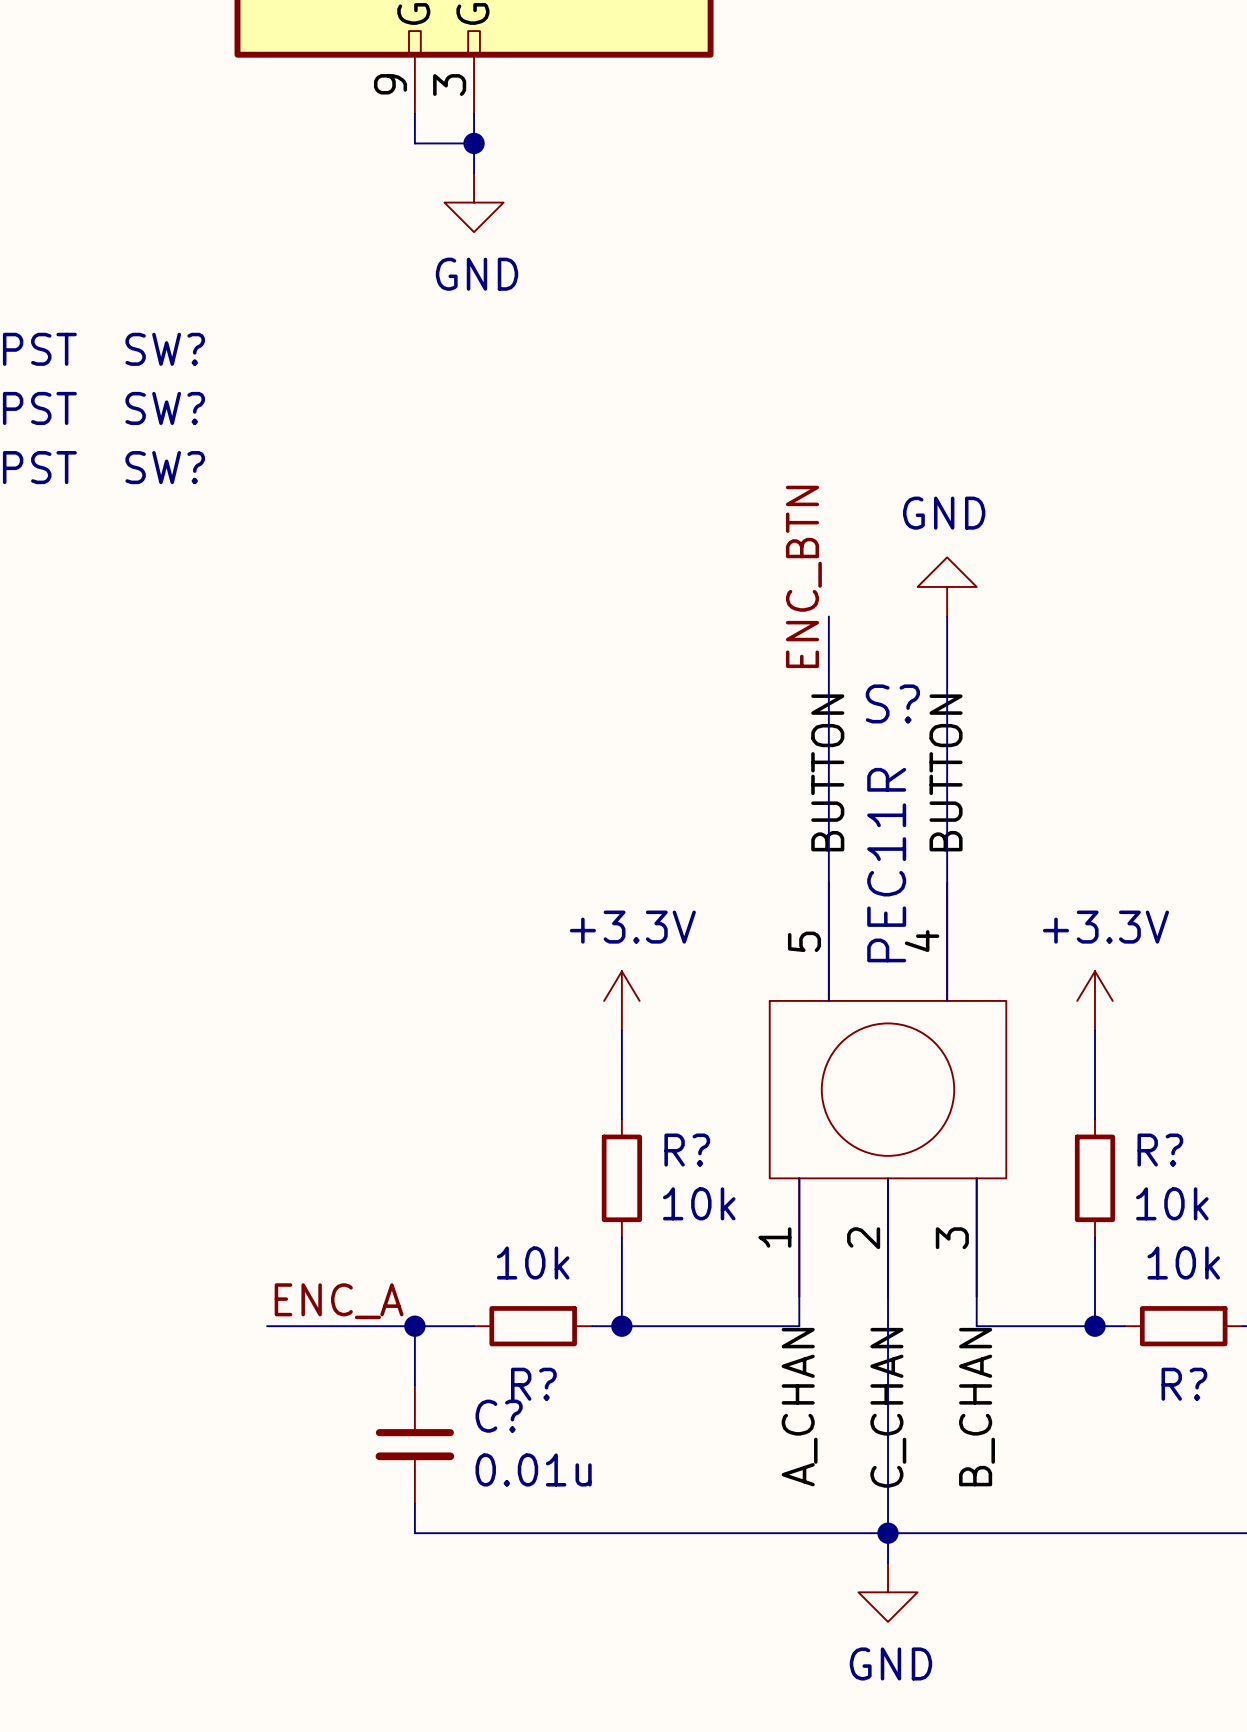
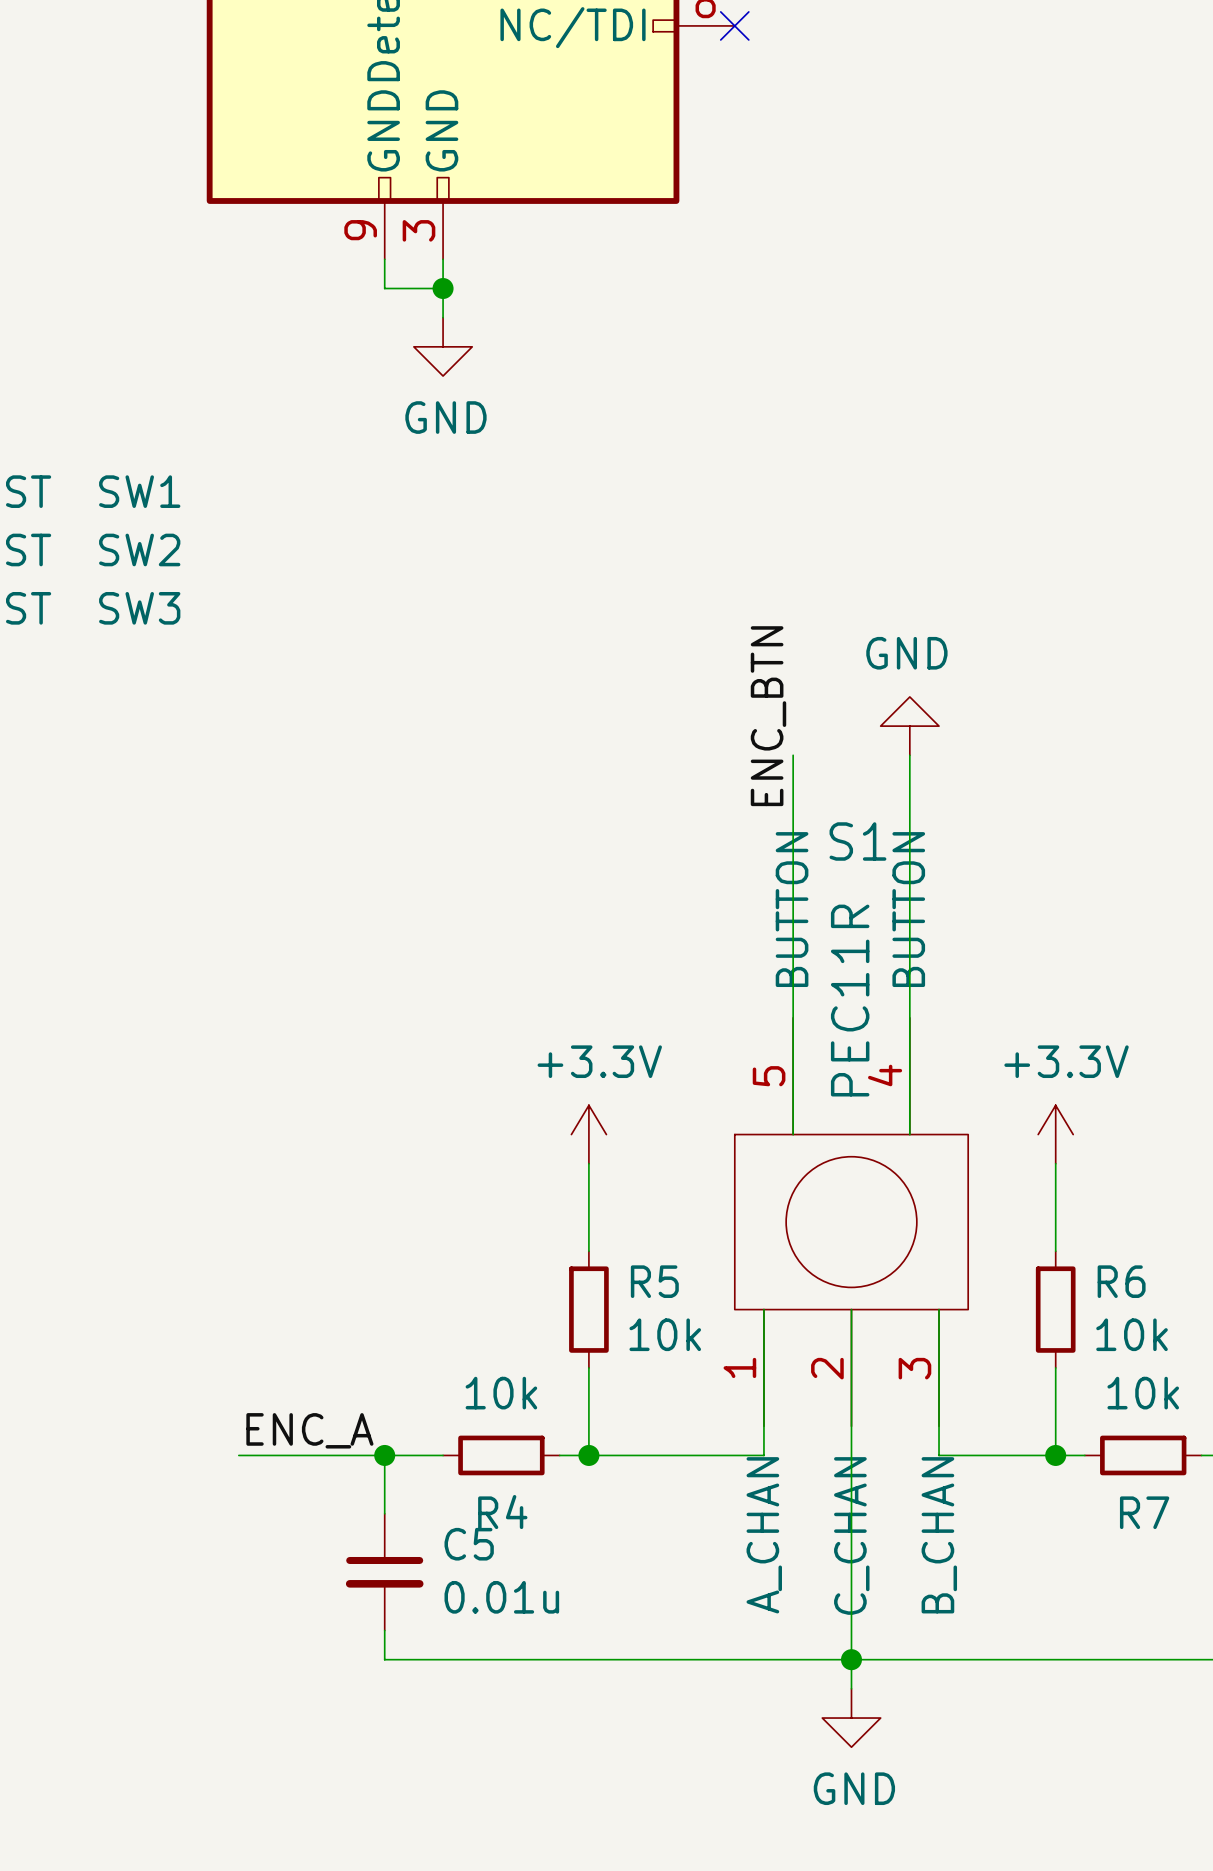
SW? name: SW? (165, 349) -> SW1 (139, 491)
SW? name: SW? (165, 408) -> SW2 (139, 549)
SW? name: SW? (165, 467) -> SW3 (139, 608)
S? name: S? (892, 703) -> S1 (857, 841)
R? name: R? (687, 1150) -> R5 (654, 1281)
R? name: R? (1160, 1150) -> R6 (1121, 1281)
R? name: R? (533, 1384) -> R4 (502, 1512)
R? name: R? (1184, 1384) -> R7 (1144, 1512)
C? name: C? (499, 1416) -> C5 (469, 1544)

